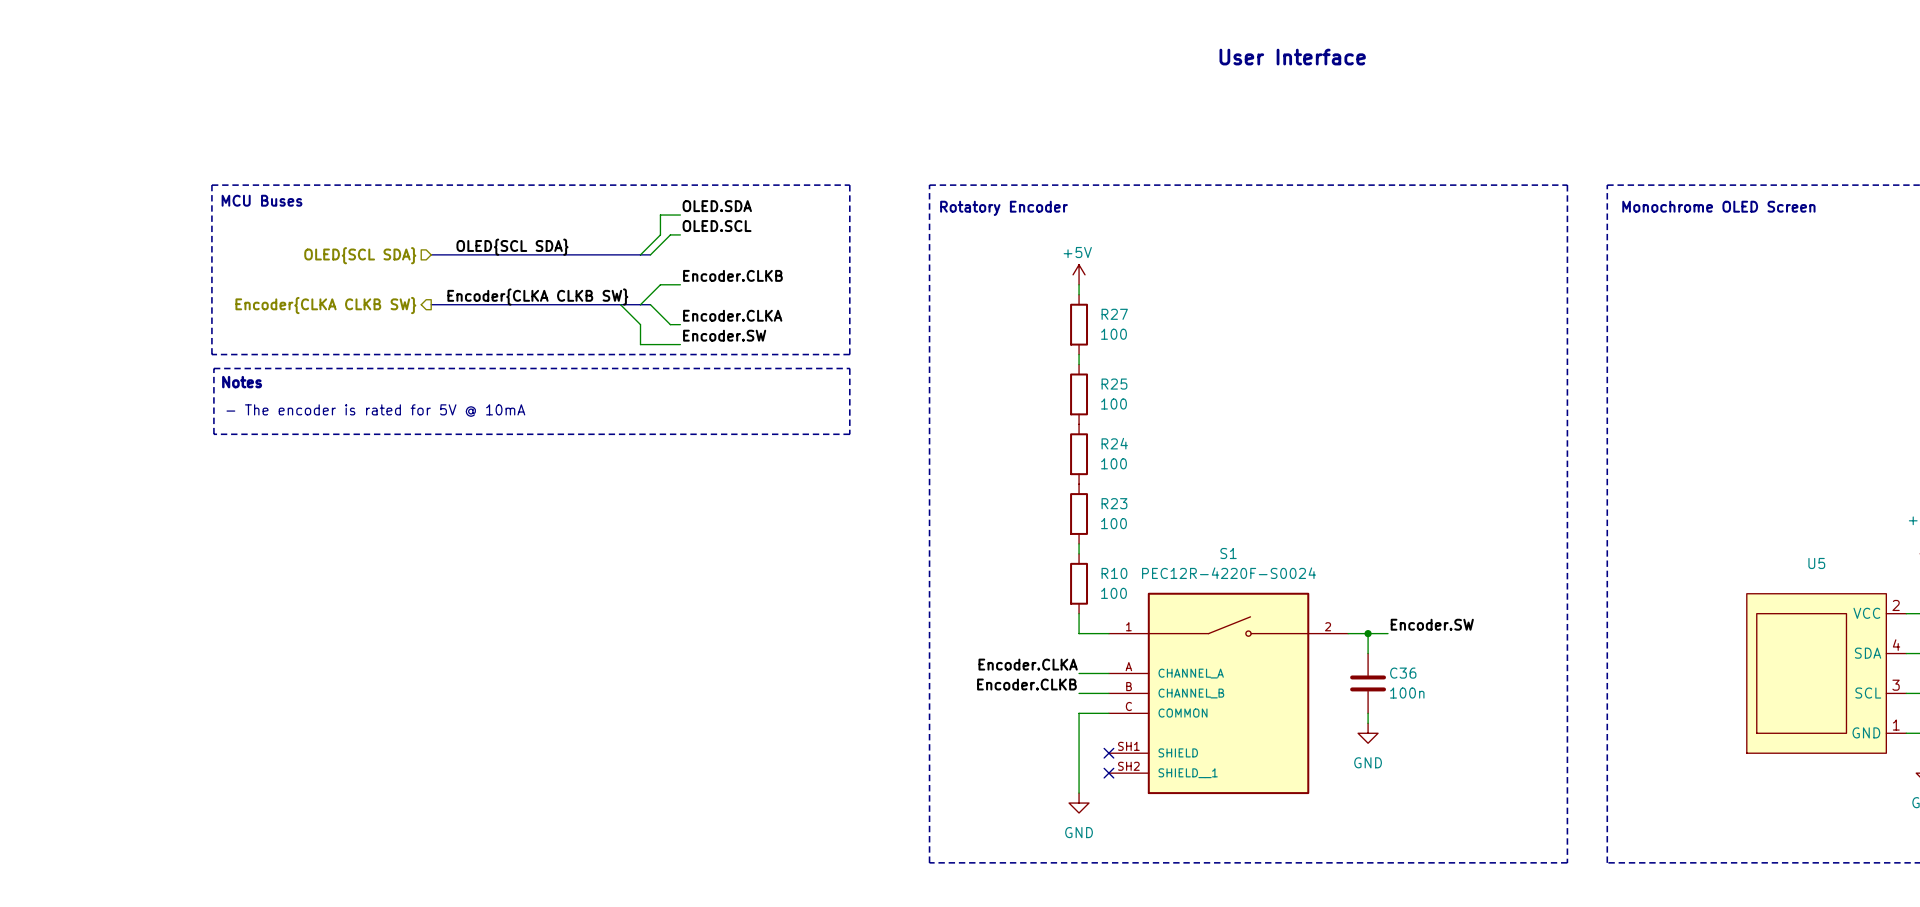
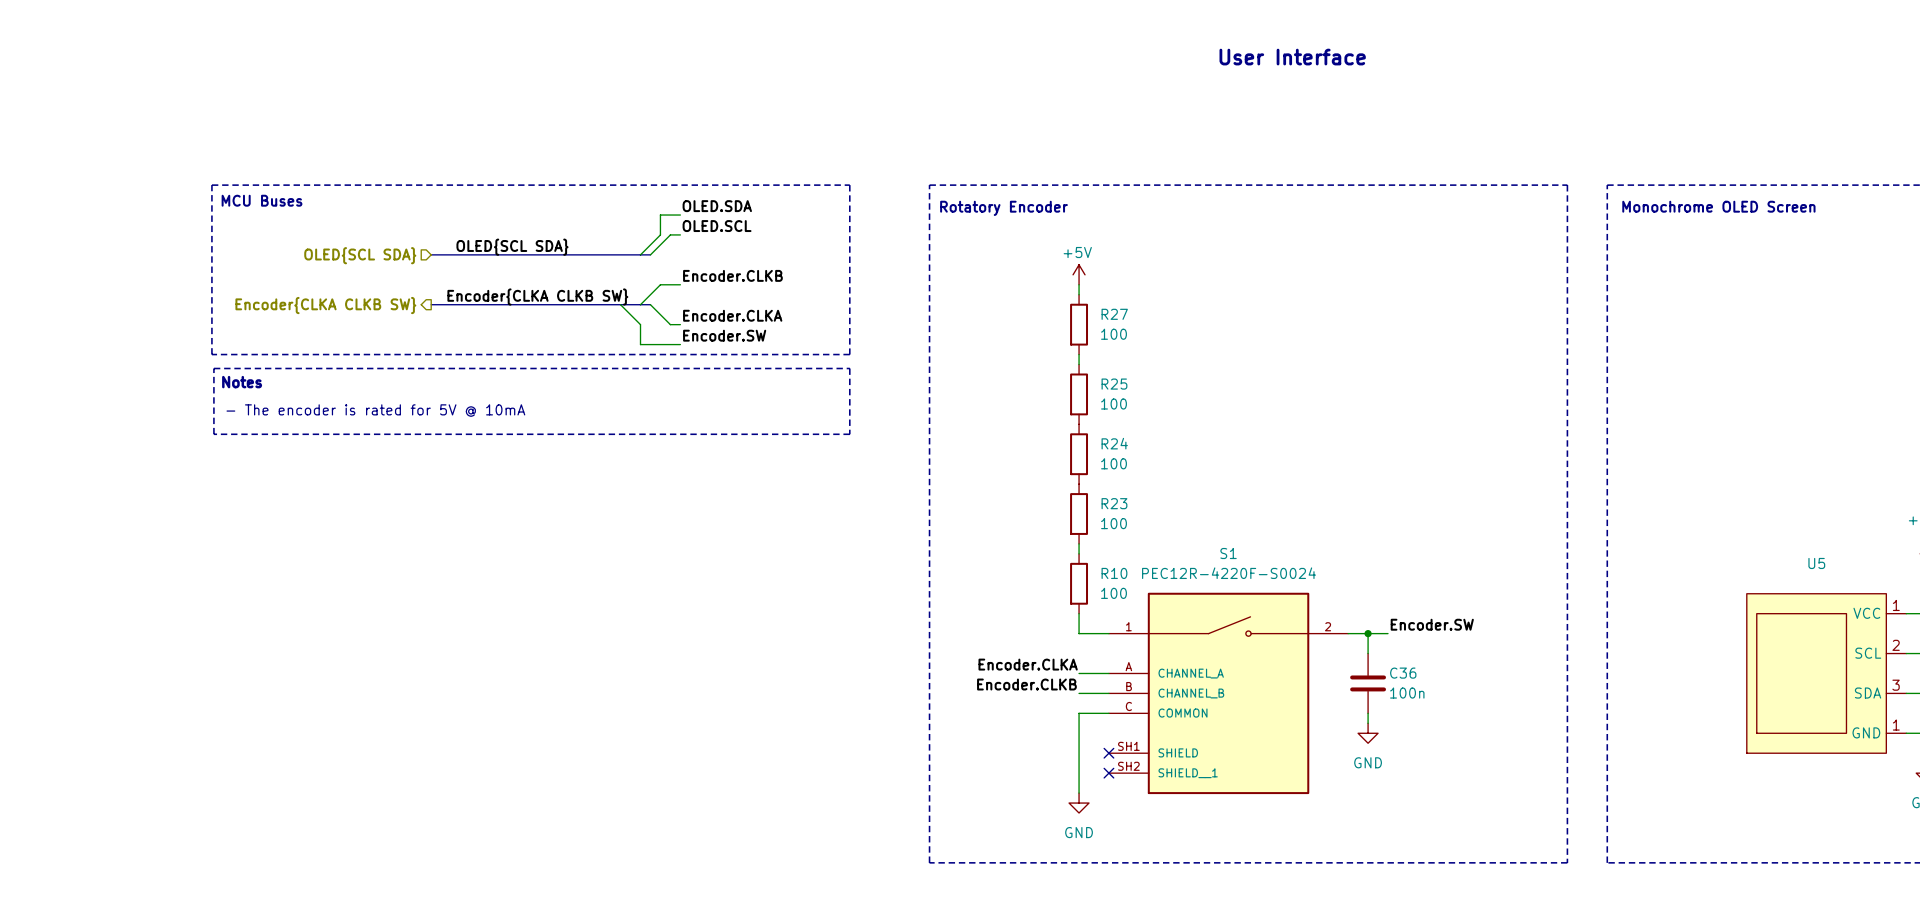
U5 pin number: 2 (1896, 605) -> 1 (1896, 605)
U5 pin number: 4 (1896, 645) -> 2 (1896, 645)
U5 pin name: SDA (1868, 653) -> SCL (1868, 653)
U5 pin name: SCL (1868, 693) -> SDA (1868, 693)

